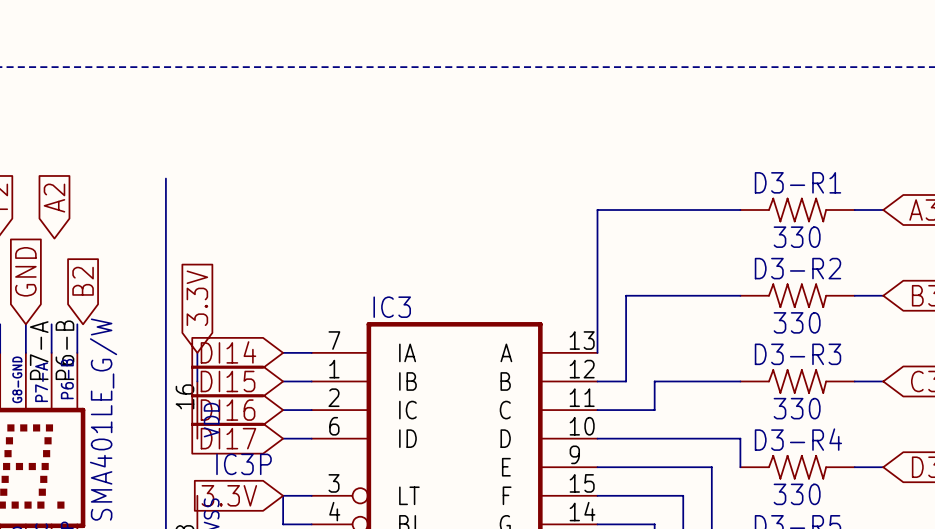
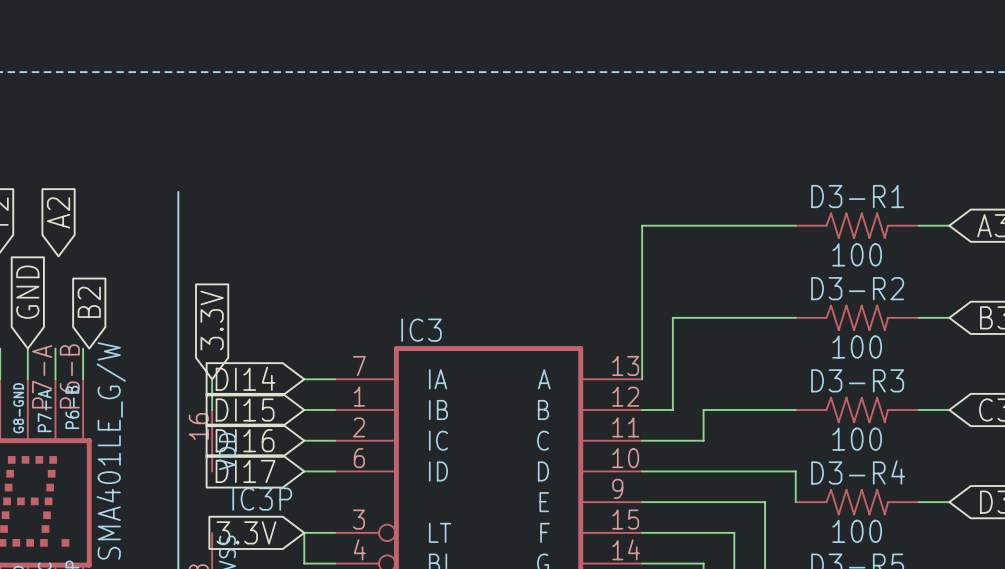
D3-R1 value: 330 (797, 237) -> 100 (857, 254)
D3-R2 value: 330 (797, 322) -> 100 (857, 347)
D3-R3 value: 330 (797, 408) -> 100 (857, 439)
D3-R4 value: 330 (797, 494) -> 100 (857, 531)

